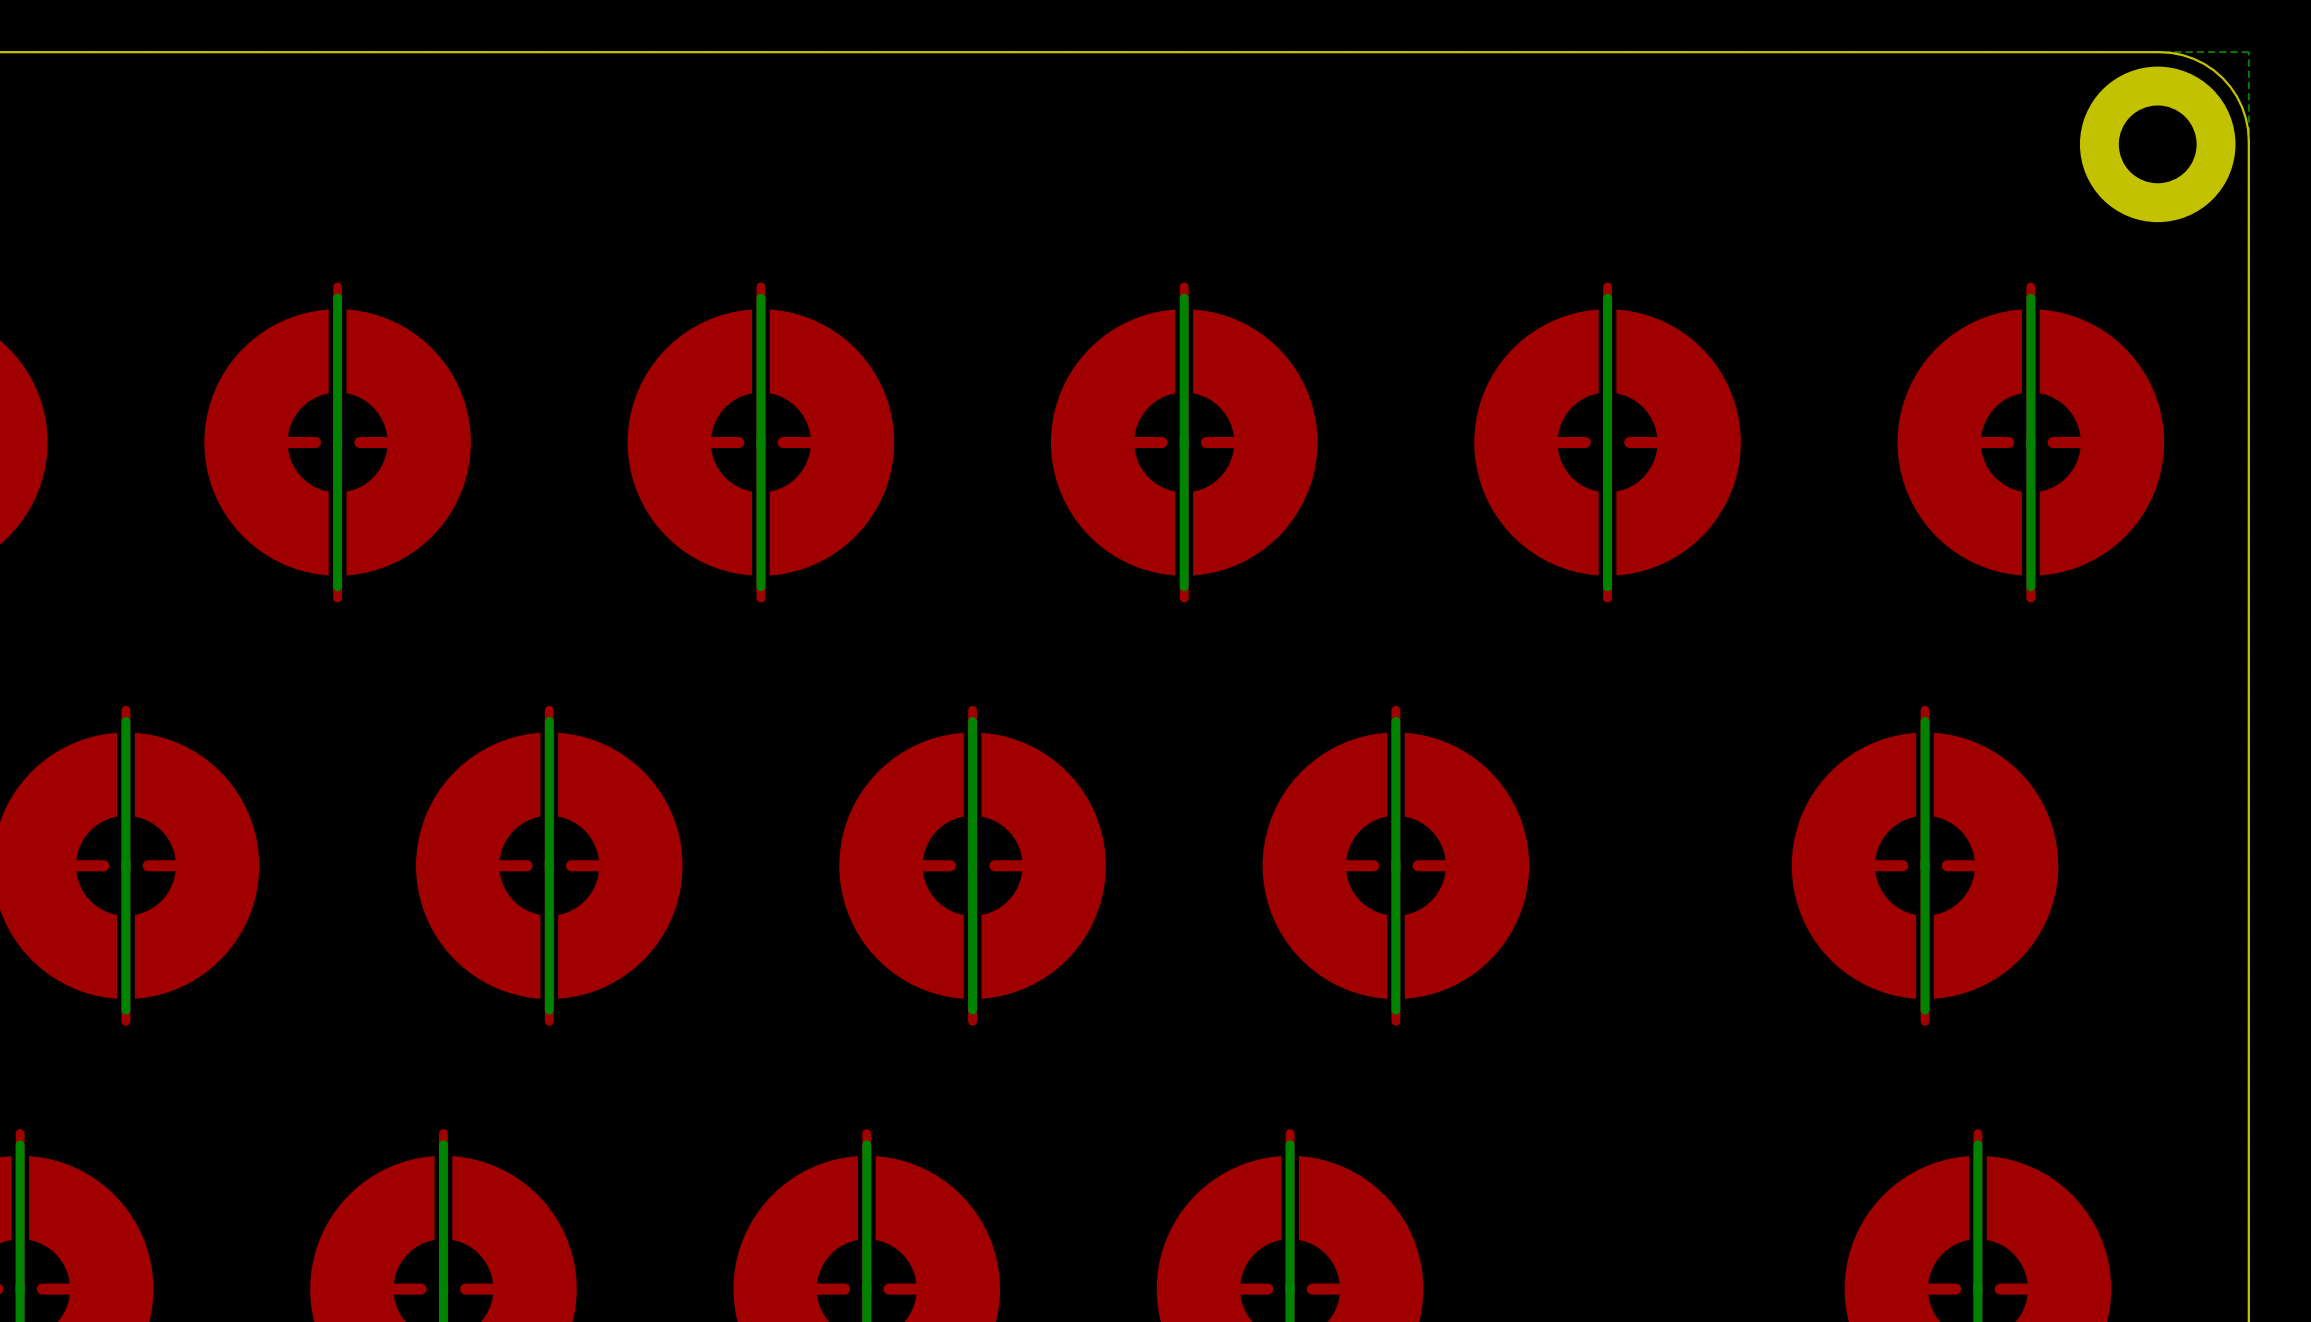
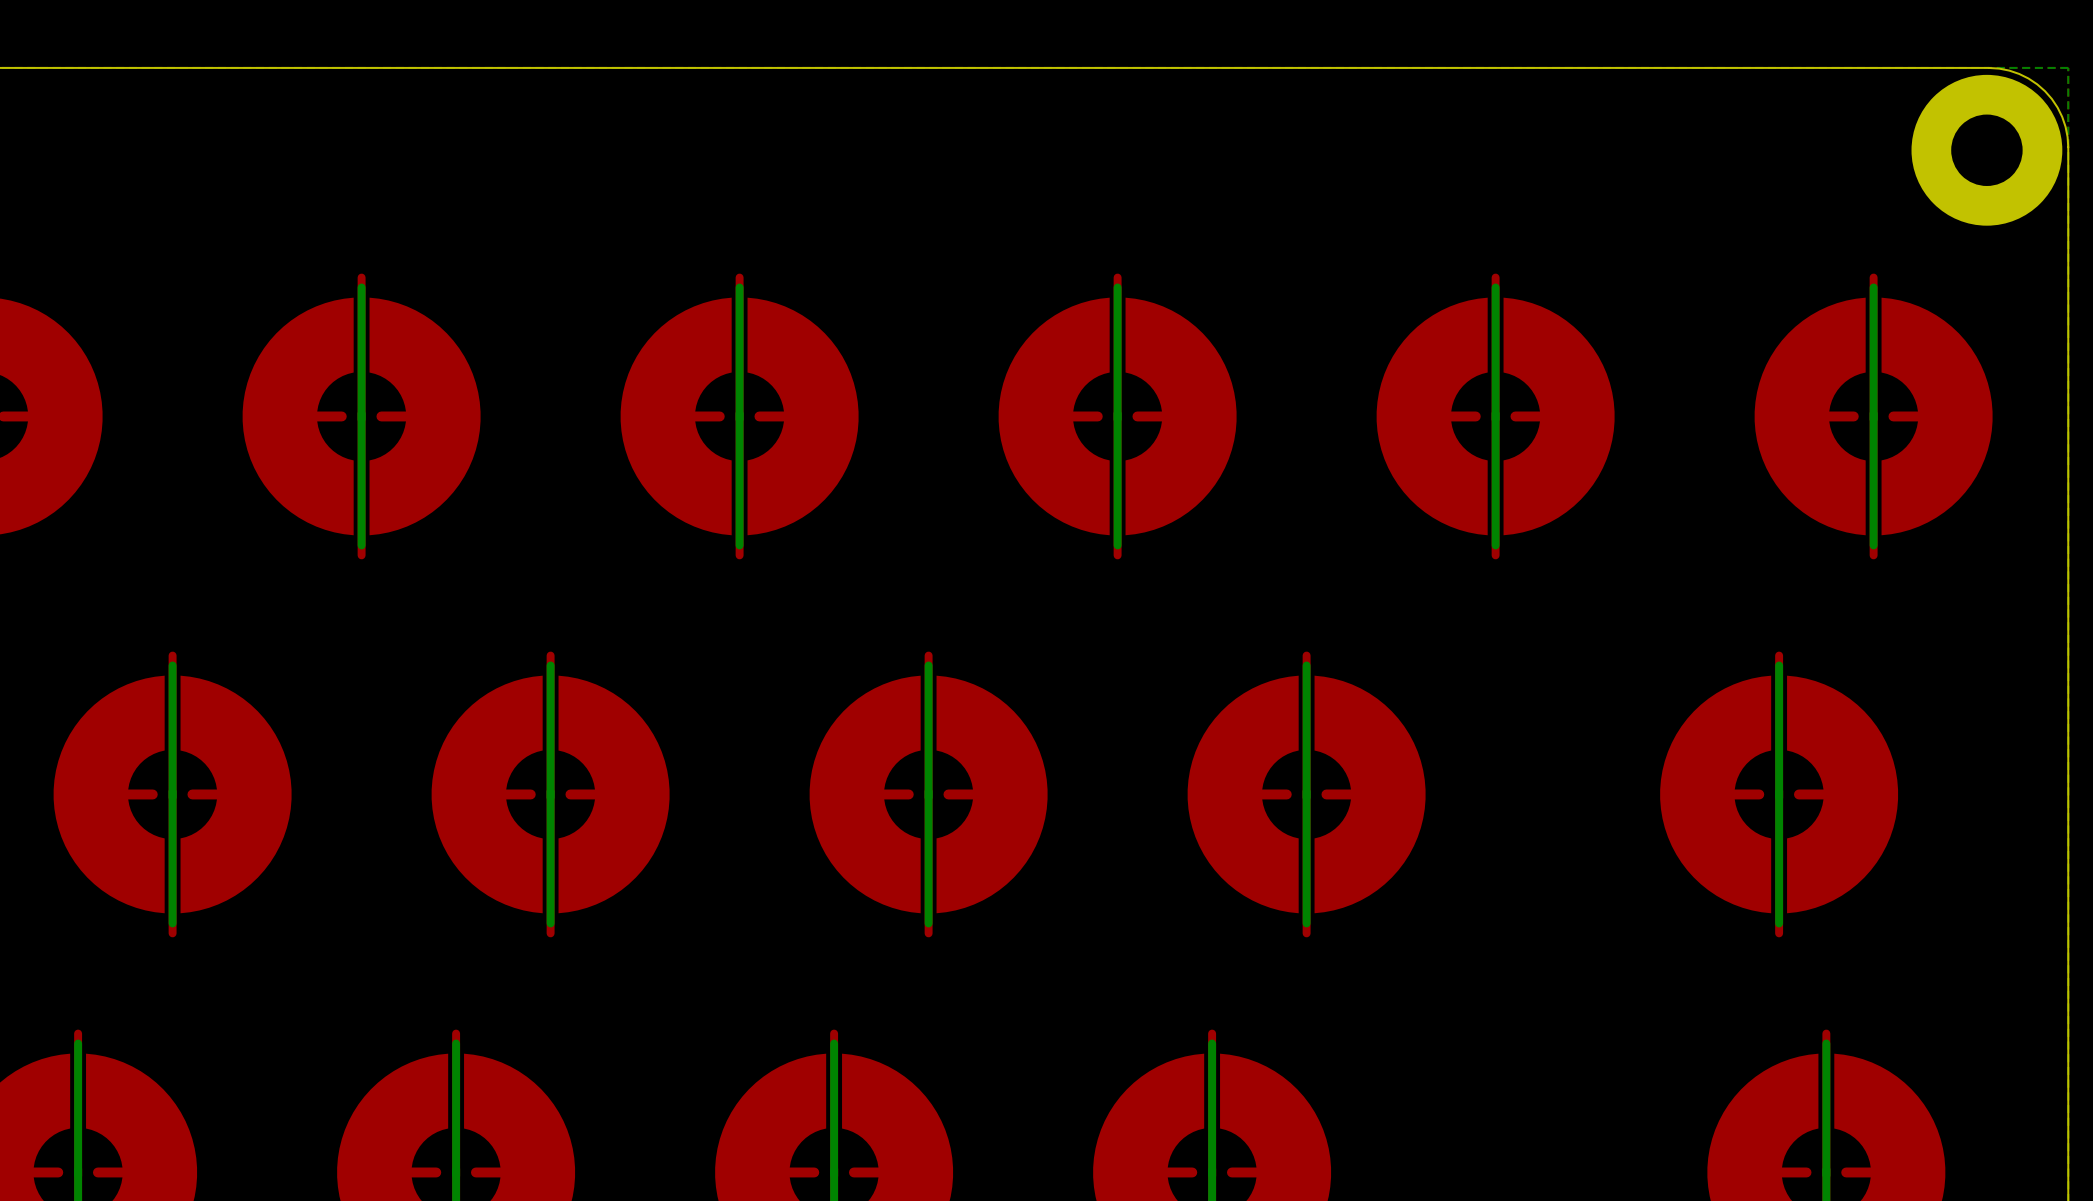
part footprint: [2079, 66, 2236, 223] -> [1911, 74, 2063, 226]

